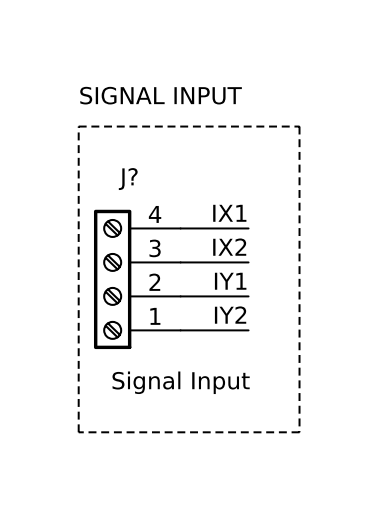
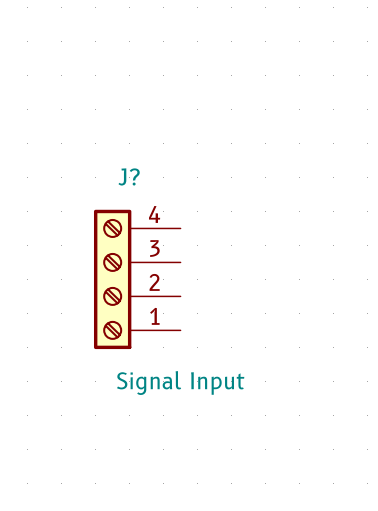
text: SIGNAL INPUT (161, 95) -> none
line: (78, 126) (299, 126) (299, 432) (78, 432) (78, 126) -> none
label: IX1 (229, 213) -> none
wire: (180, 228) (248, 228) -> none
label: IX2 (229, 247) -> none
wire: (180, 262) (248, 262) -> none
label: IY1 (230, 281) -> none
wire: (180, 296) (248, 296) -> none
label: IY2 (230, 315) -> none
wire: (180, 330) (248, 330) -> none

